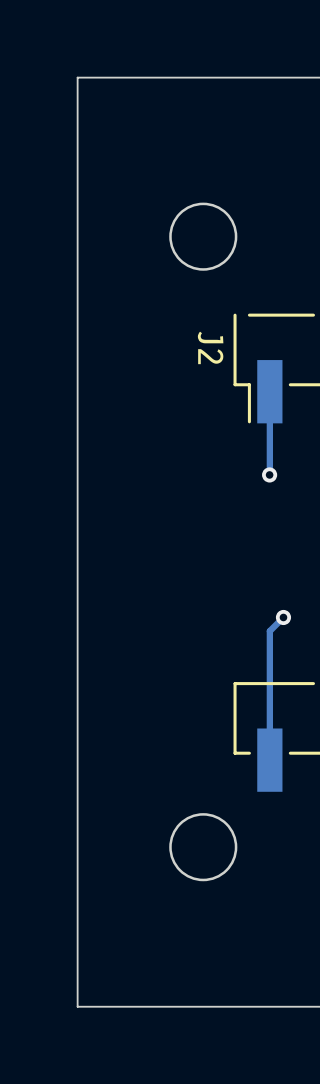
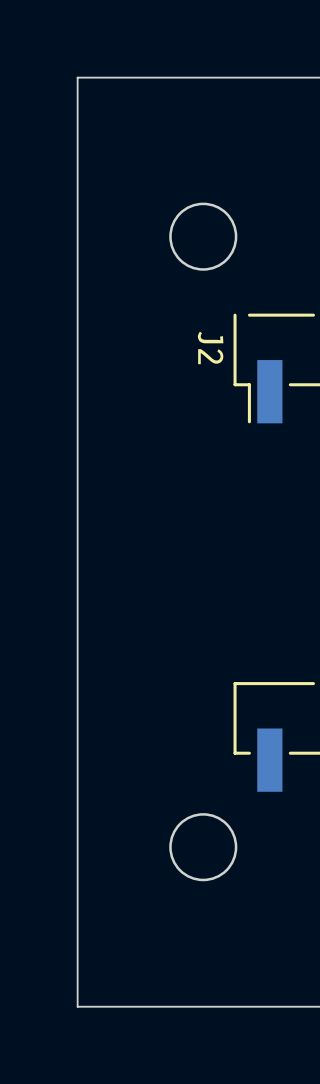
track: (269, 391) (269, 474) -> none
via: (269, 474) -> none
track: (283, 617) (269, 631) (269, 760) -> none
via: (283, 617) -> none

